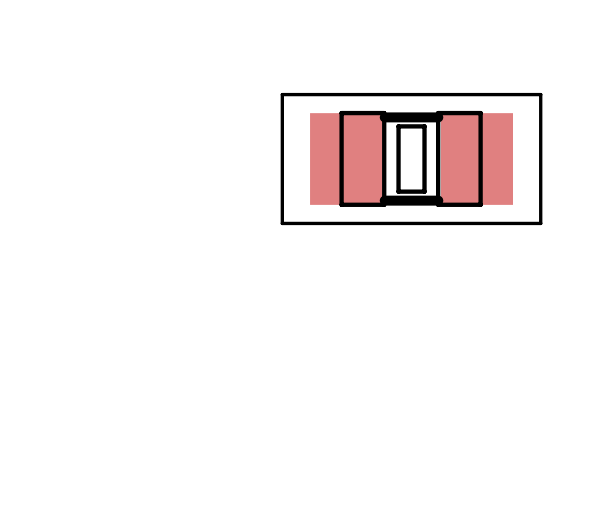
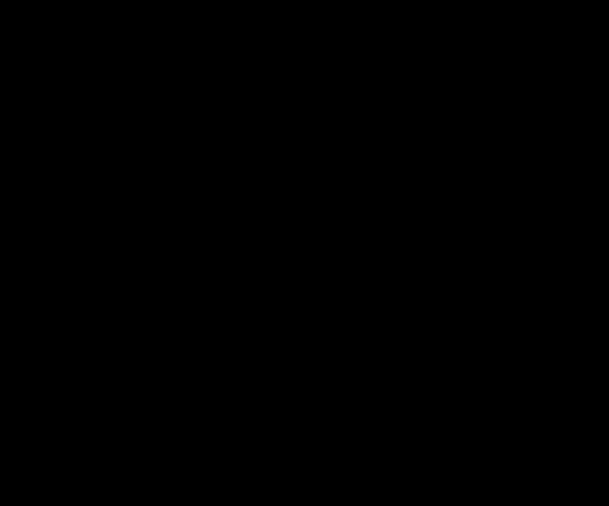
part: (411, 159) -> none

